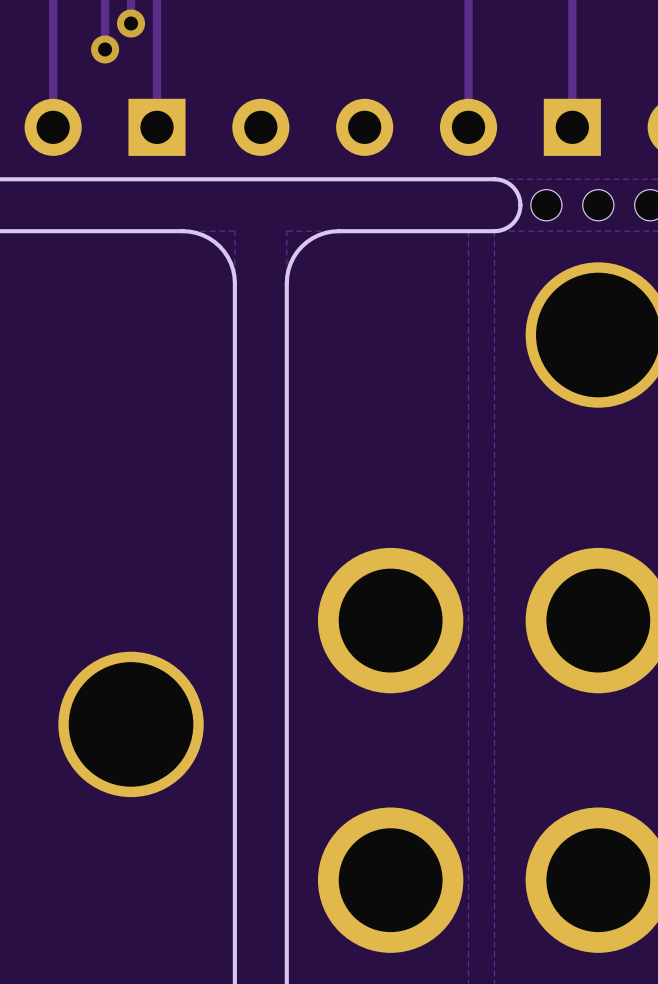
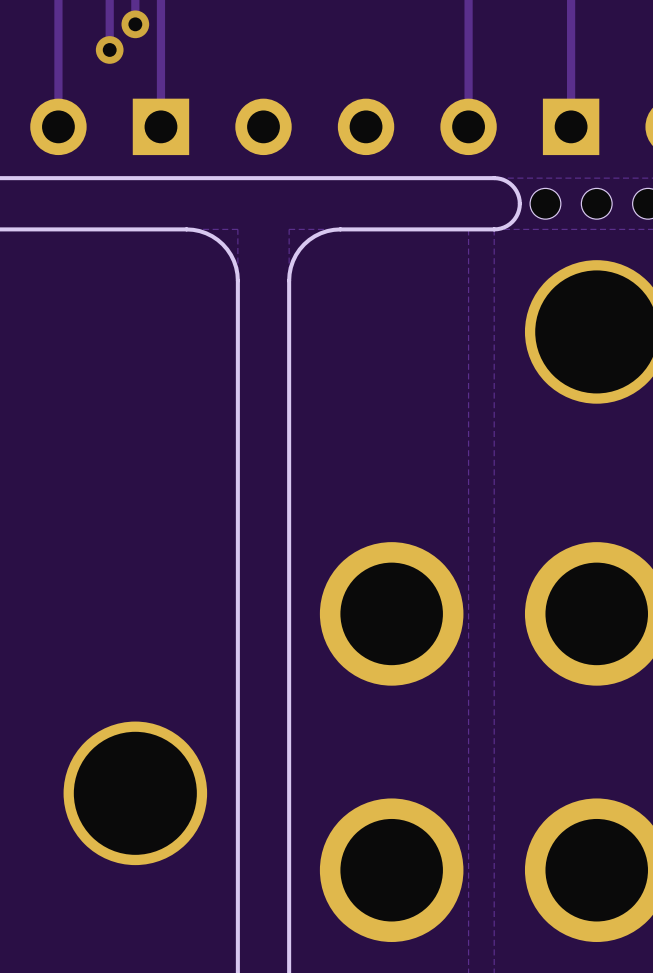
part position: (131, 724) -> (135, 793)

